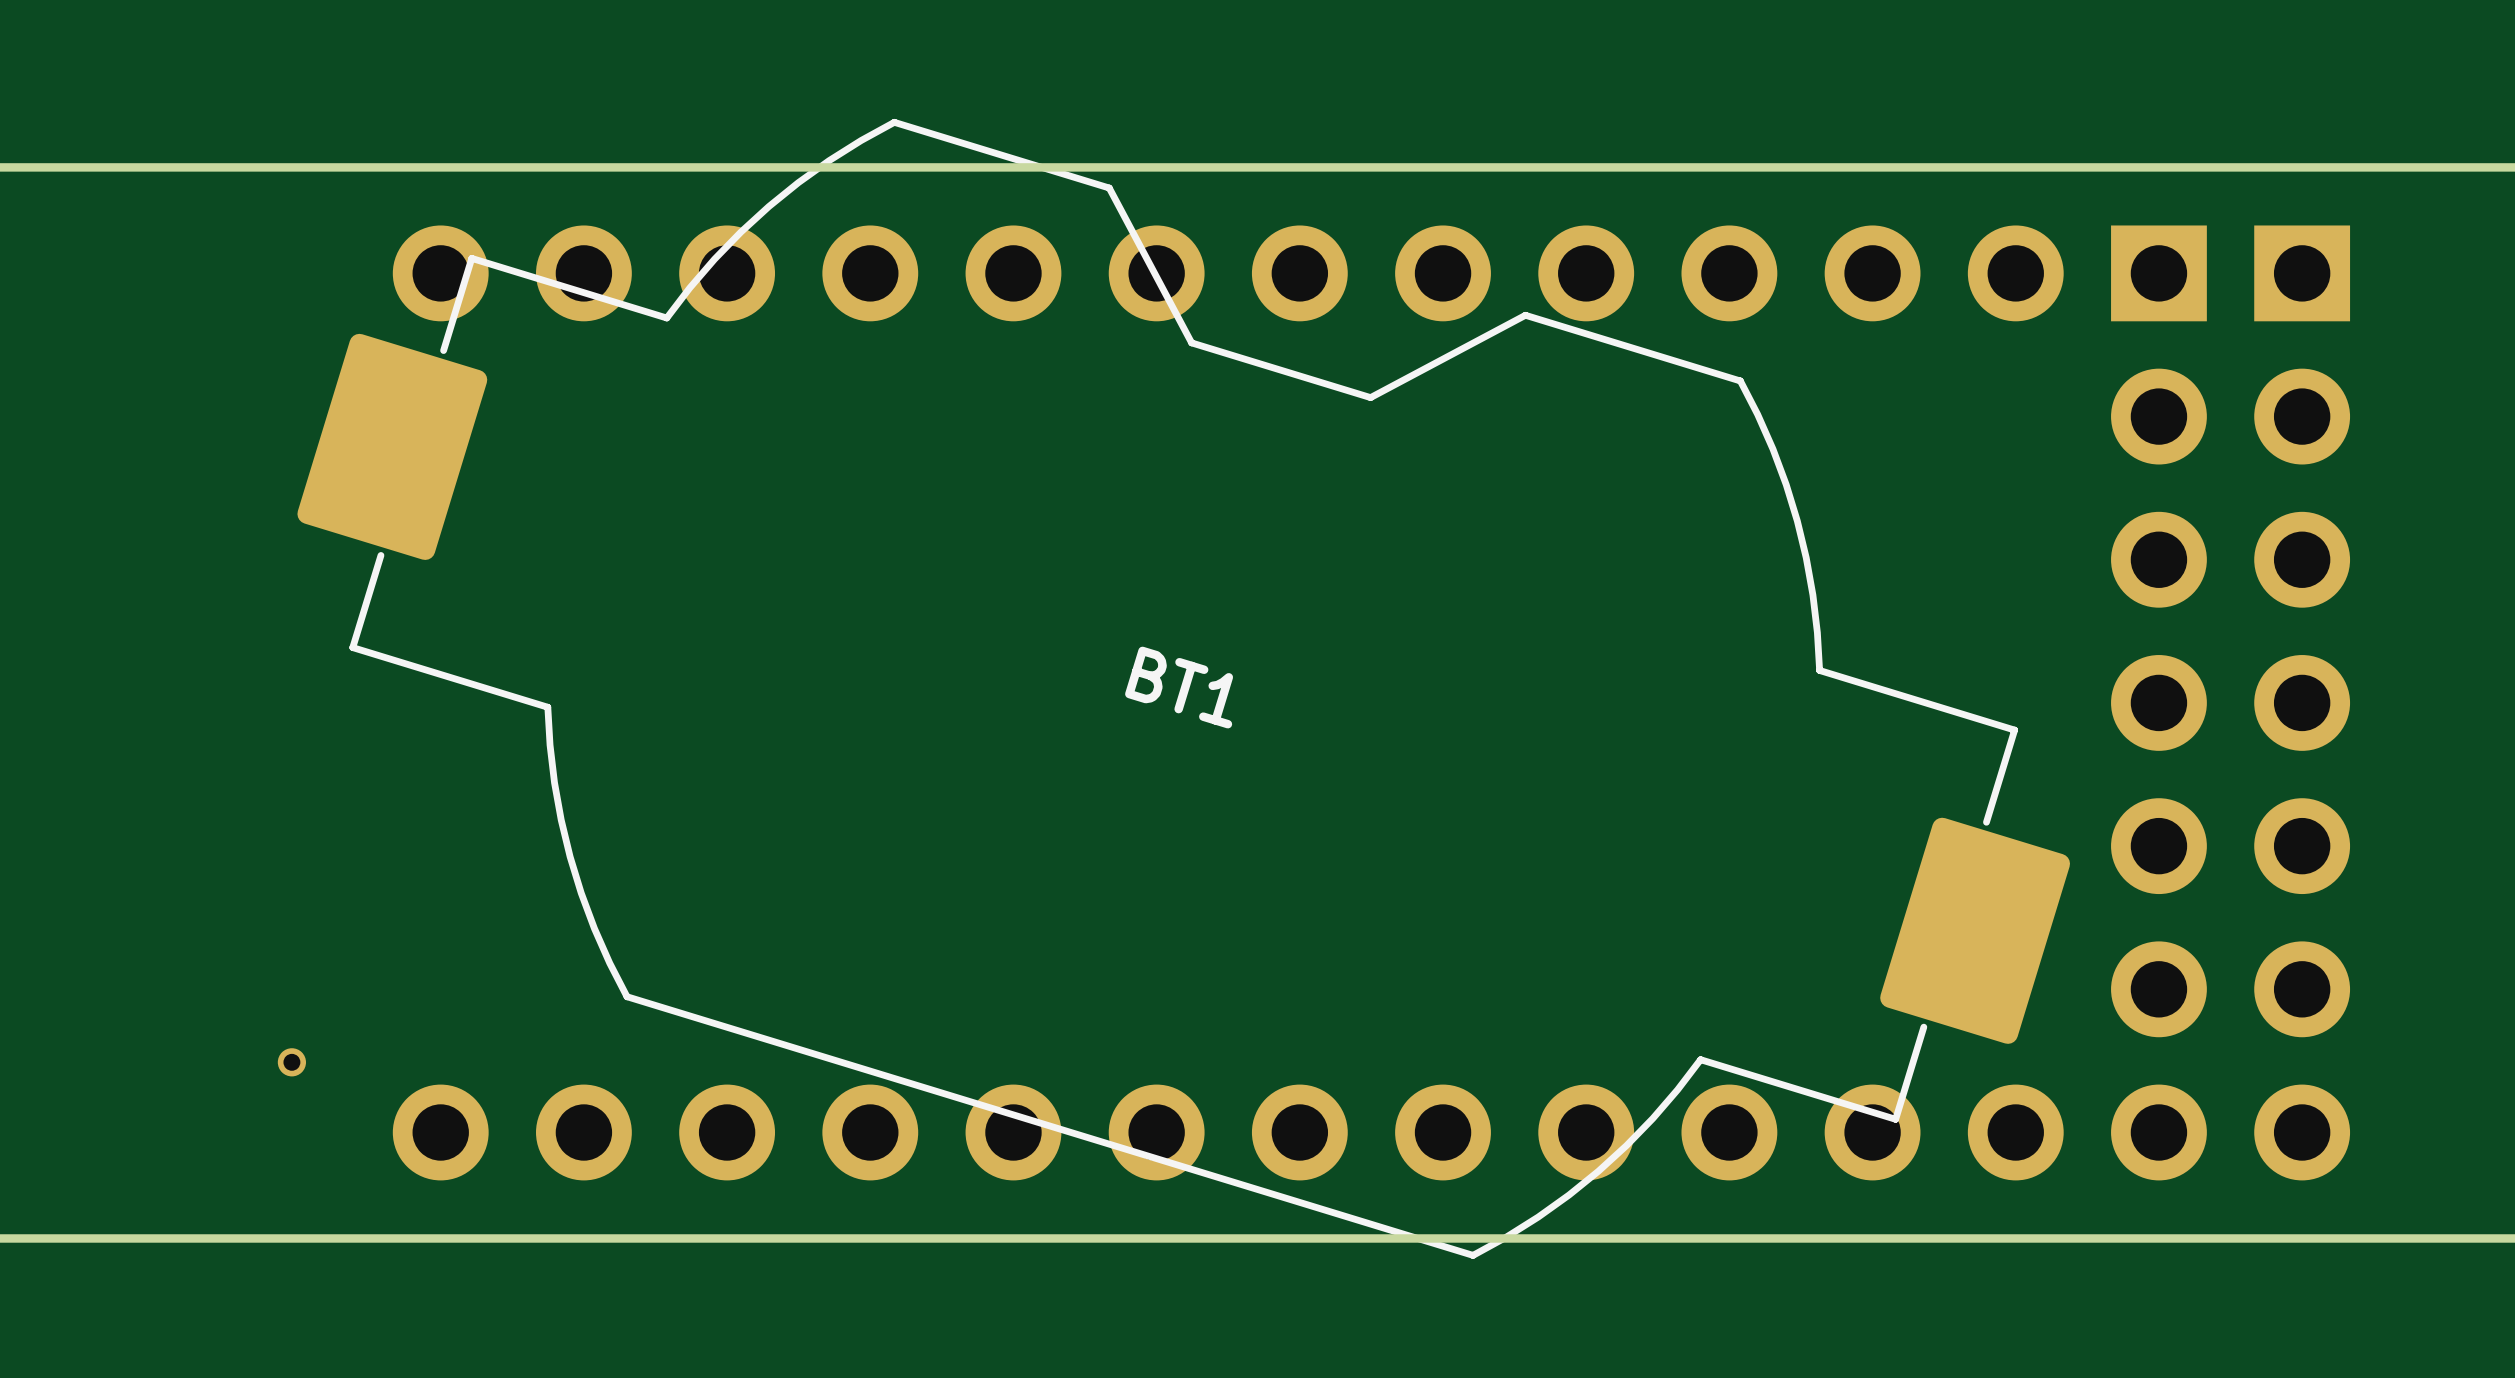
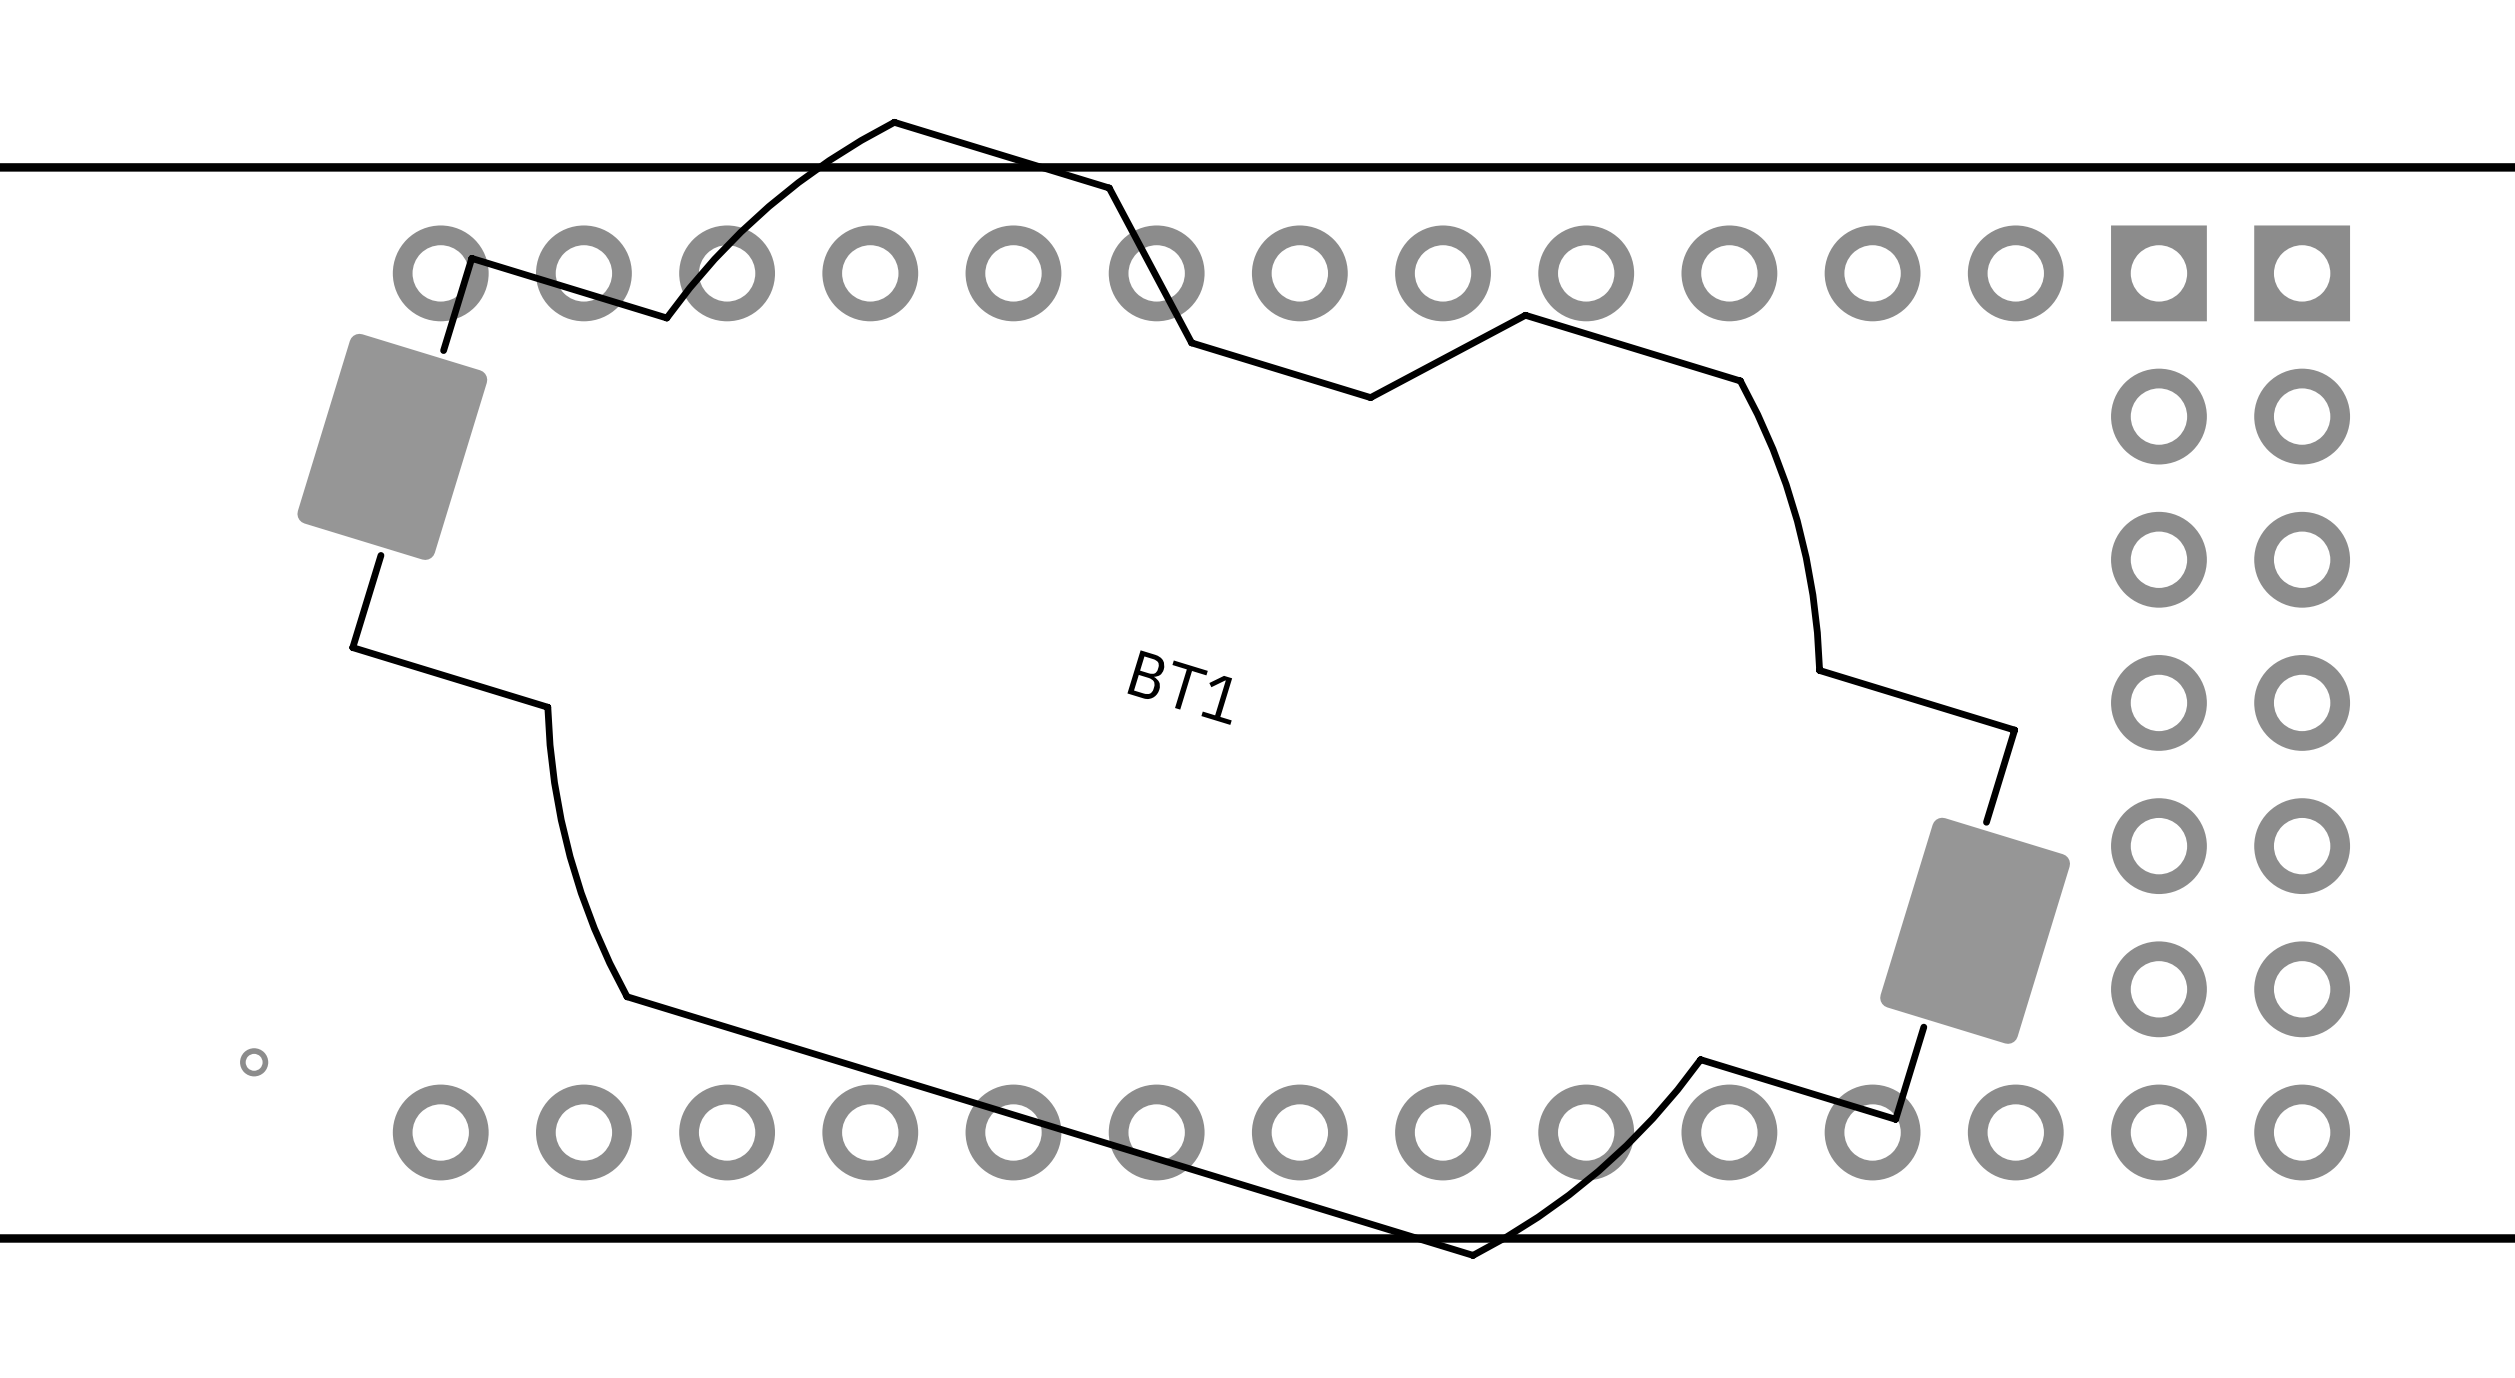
part position: (291, 1062) -> (254, 1062)

